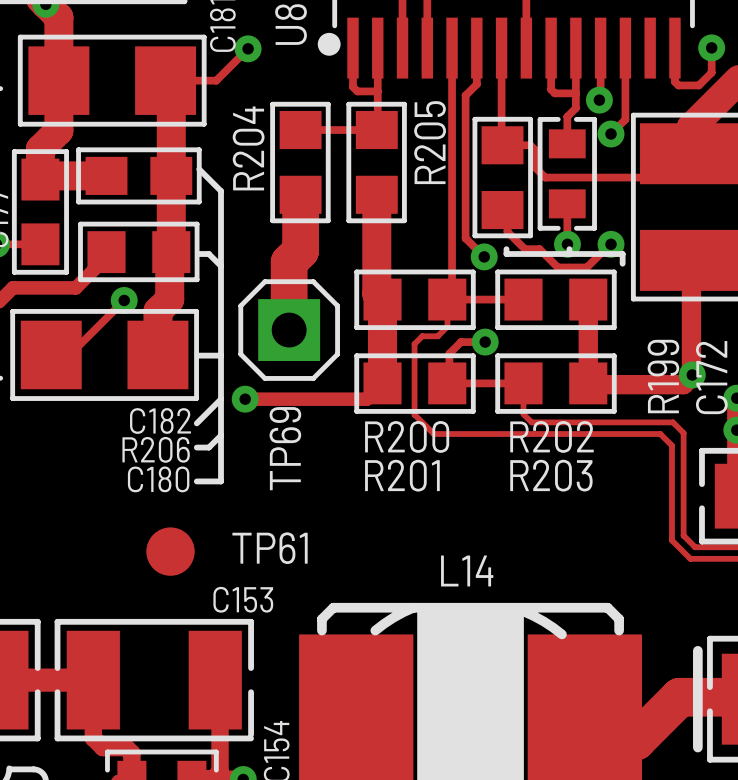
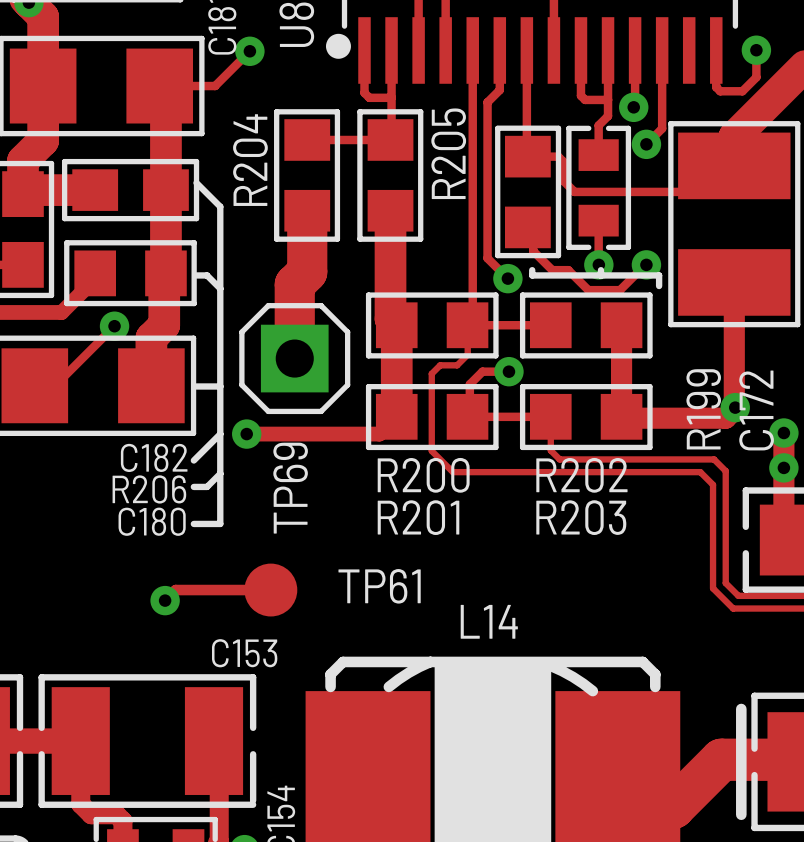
track: none -> (270, 590) (175, 590) (165, 600)
TP61 position: (170, 551) -> (270, 590)
via: none -> (165, 600)

